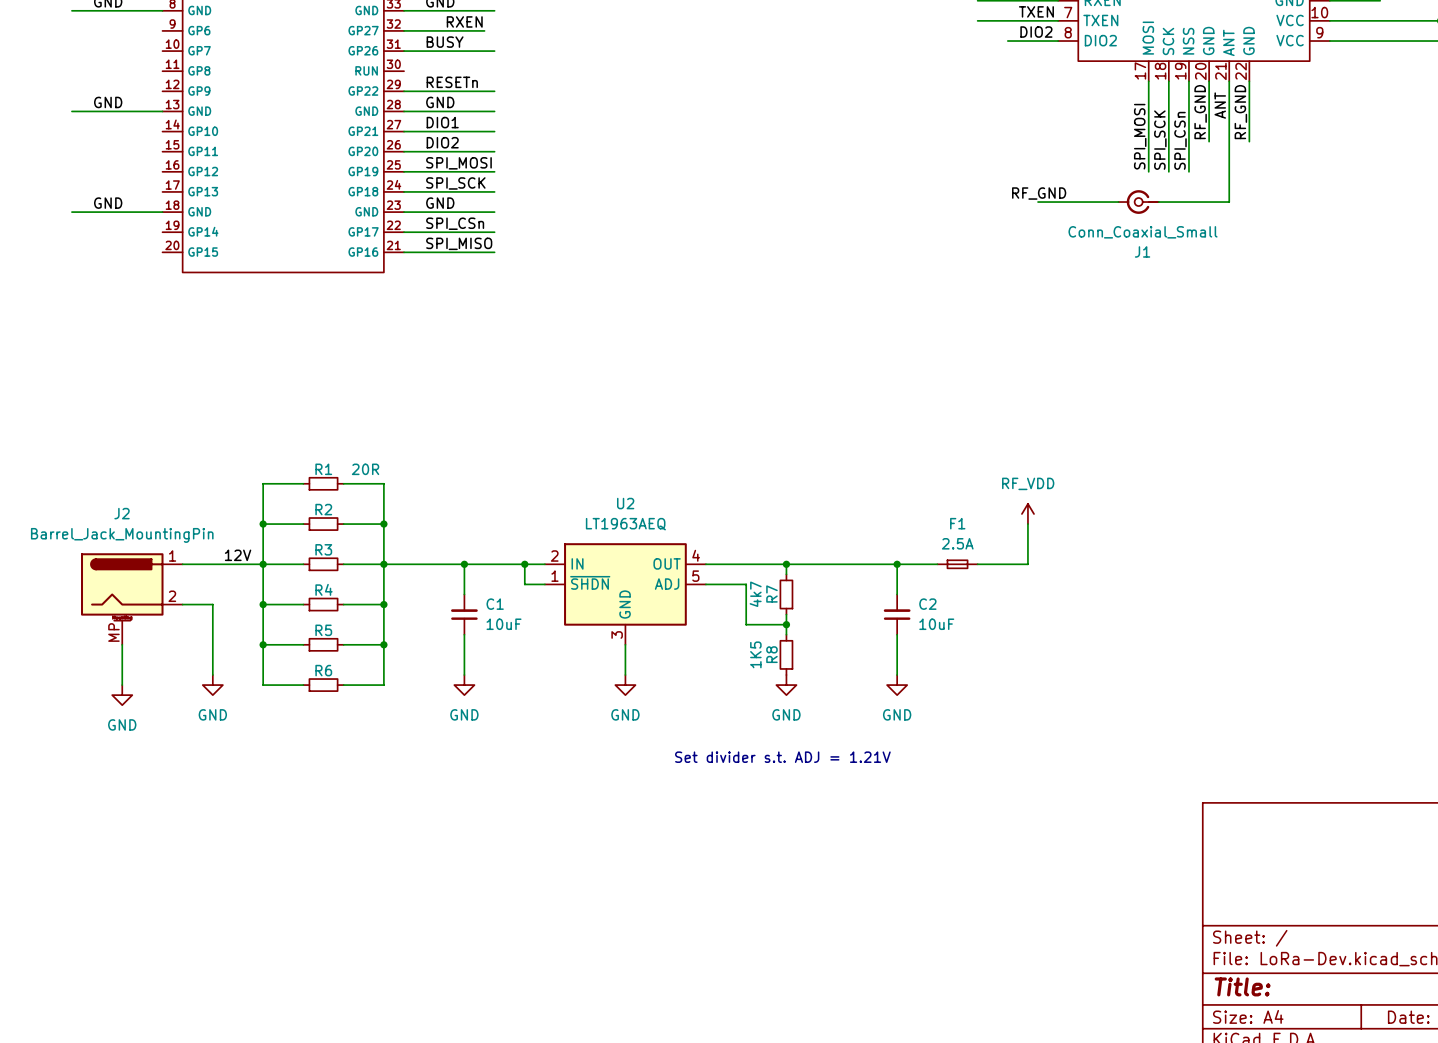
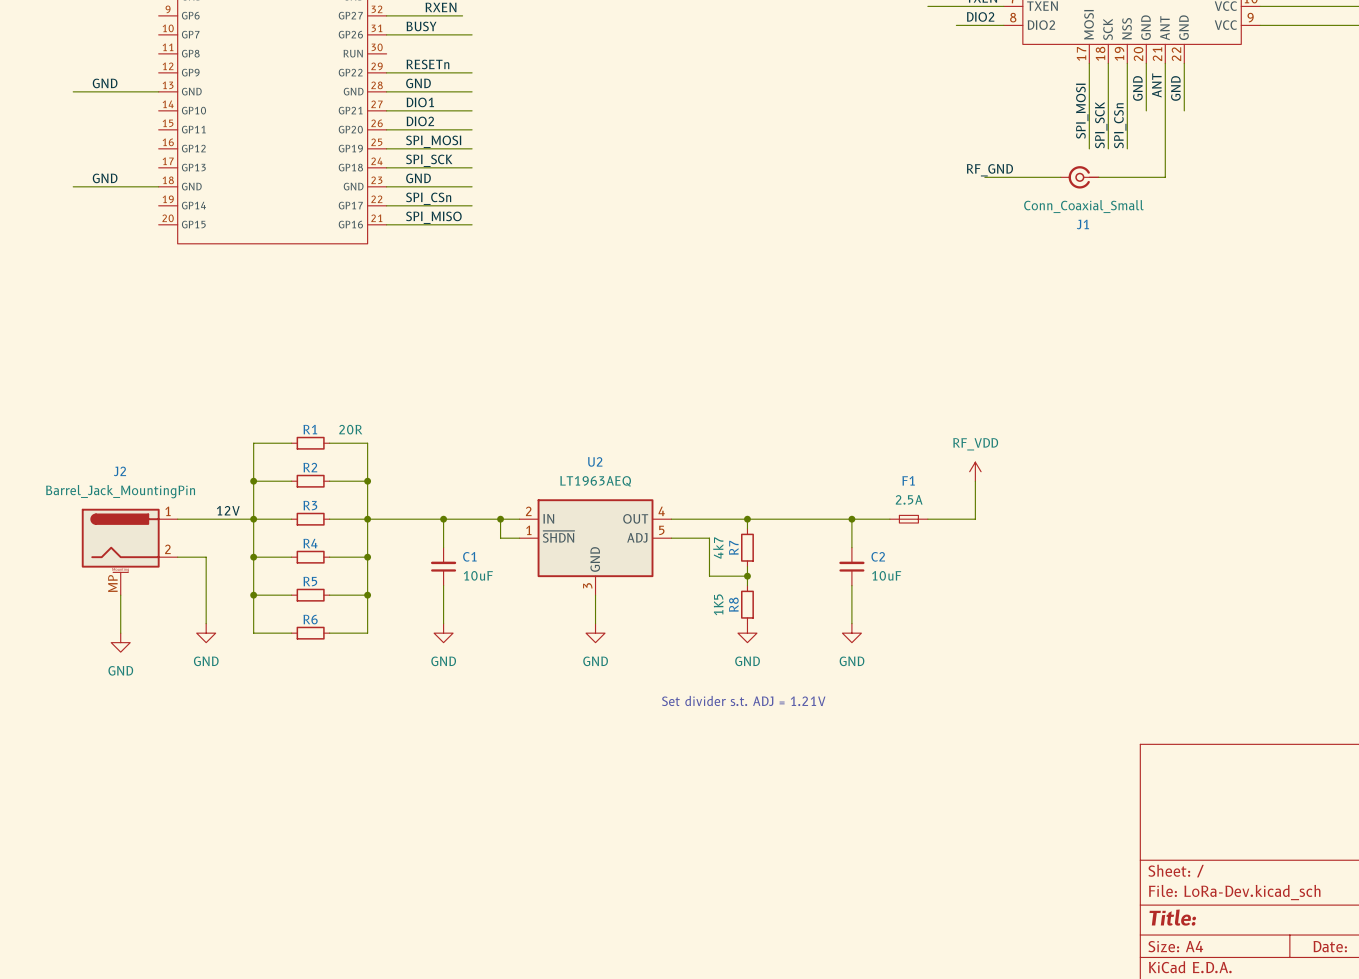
label: RF_GND (1200, 112) -> GND (1137, 88)
label: RF_GND (1240, 112) -> GND (1175, 88)
wire: (1209, 131) (1209, 141) -> none
wire: (1249, 131) (1249, 141) -> none

